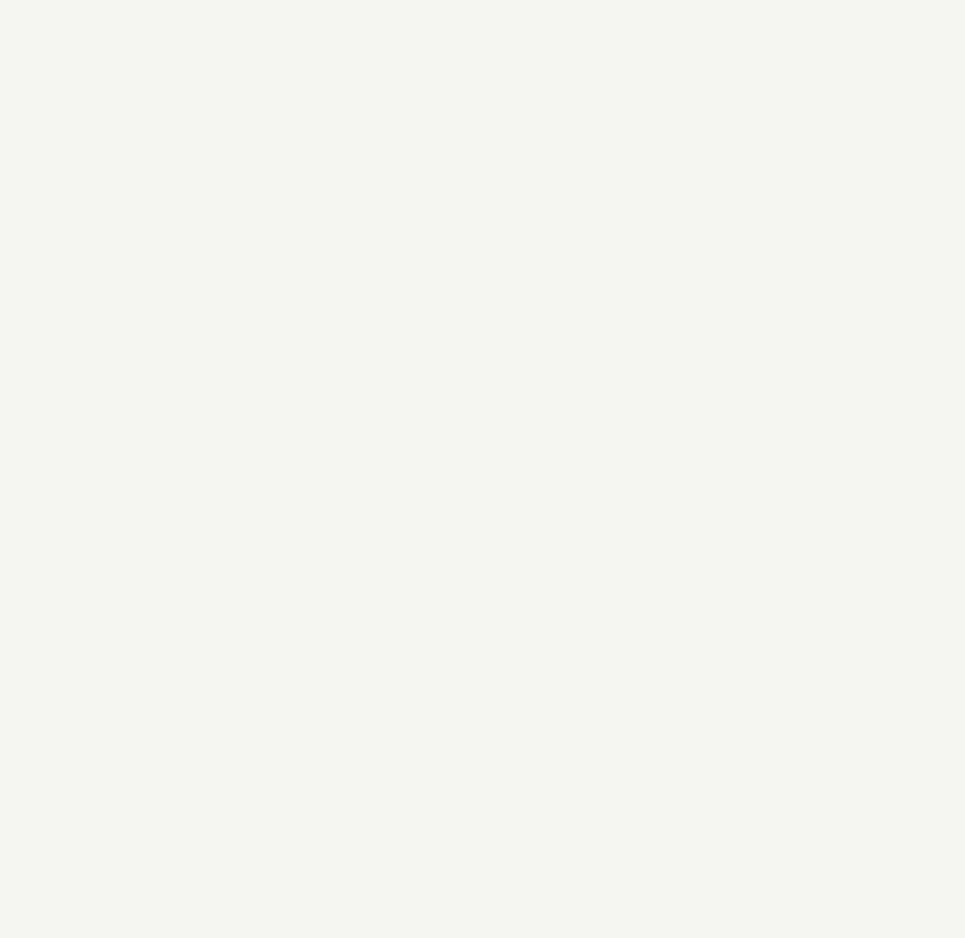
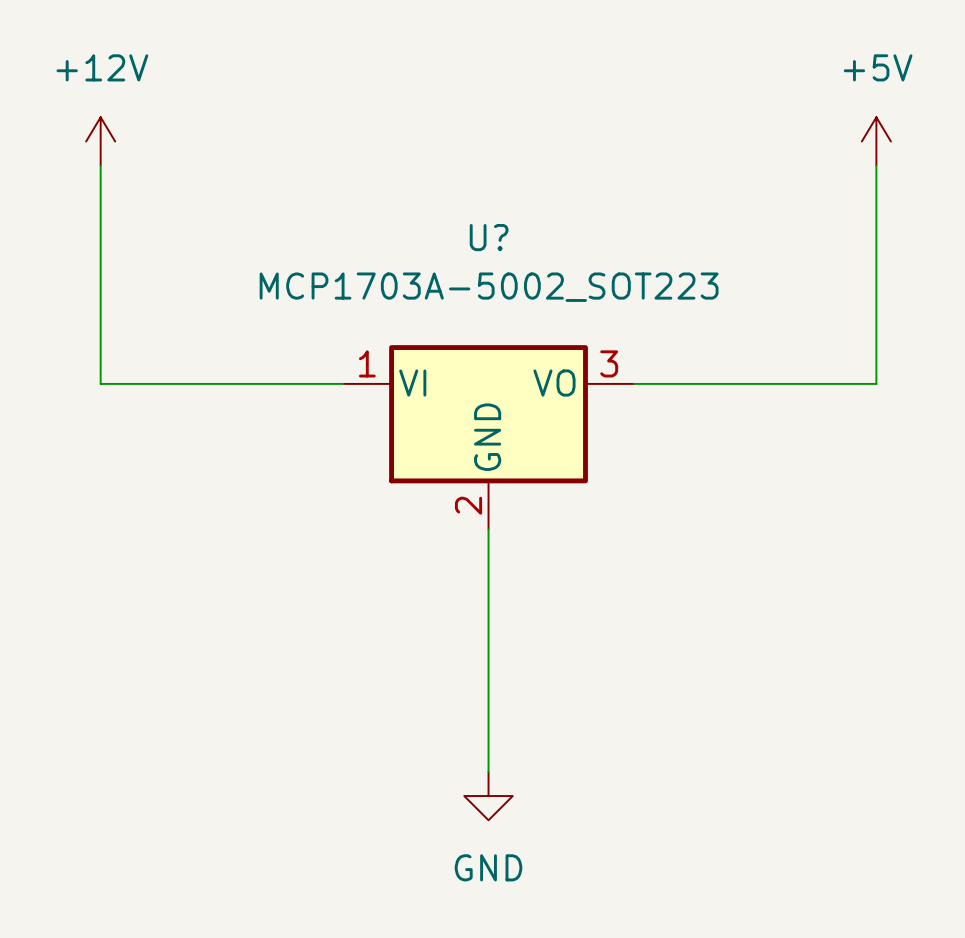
power symbol: none -> +12V (100, 141)
power symbol: none -> +5V (876, 141)
wire: none -> (100, 165) (100, 383) (343, 383)
wire: none -> (876, 165) (876, 383) (633, 383)
U?: none -> MCP1703A-5002_SOT223 (488, 437)
wire: none -> (488, 529) (488, 771)
power symbol: none -> GND (488, 796)

